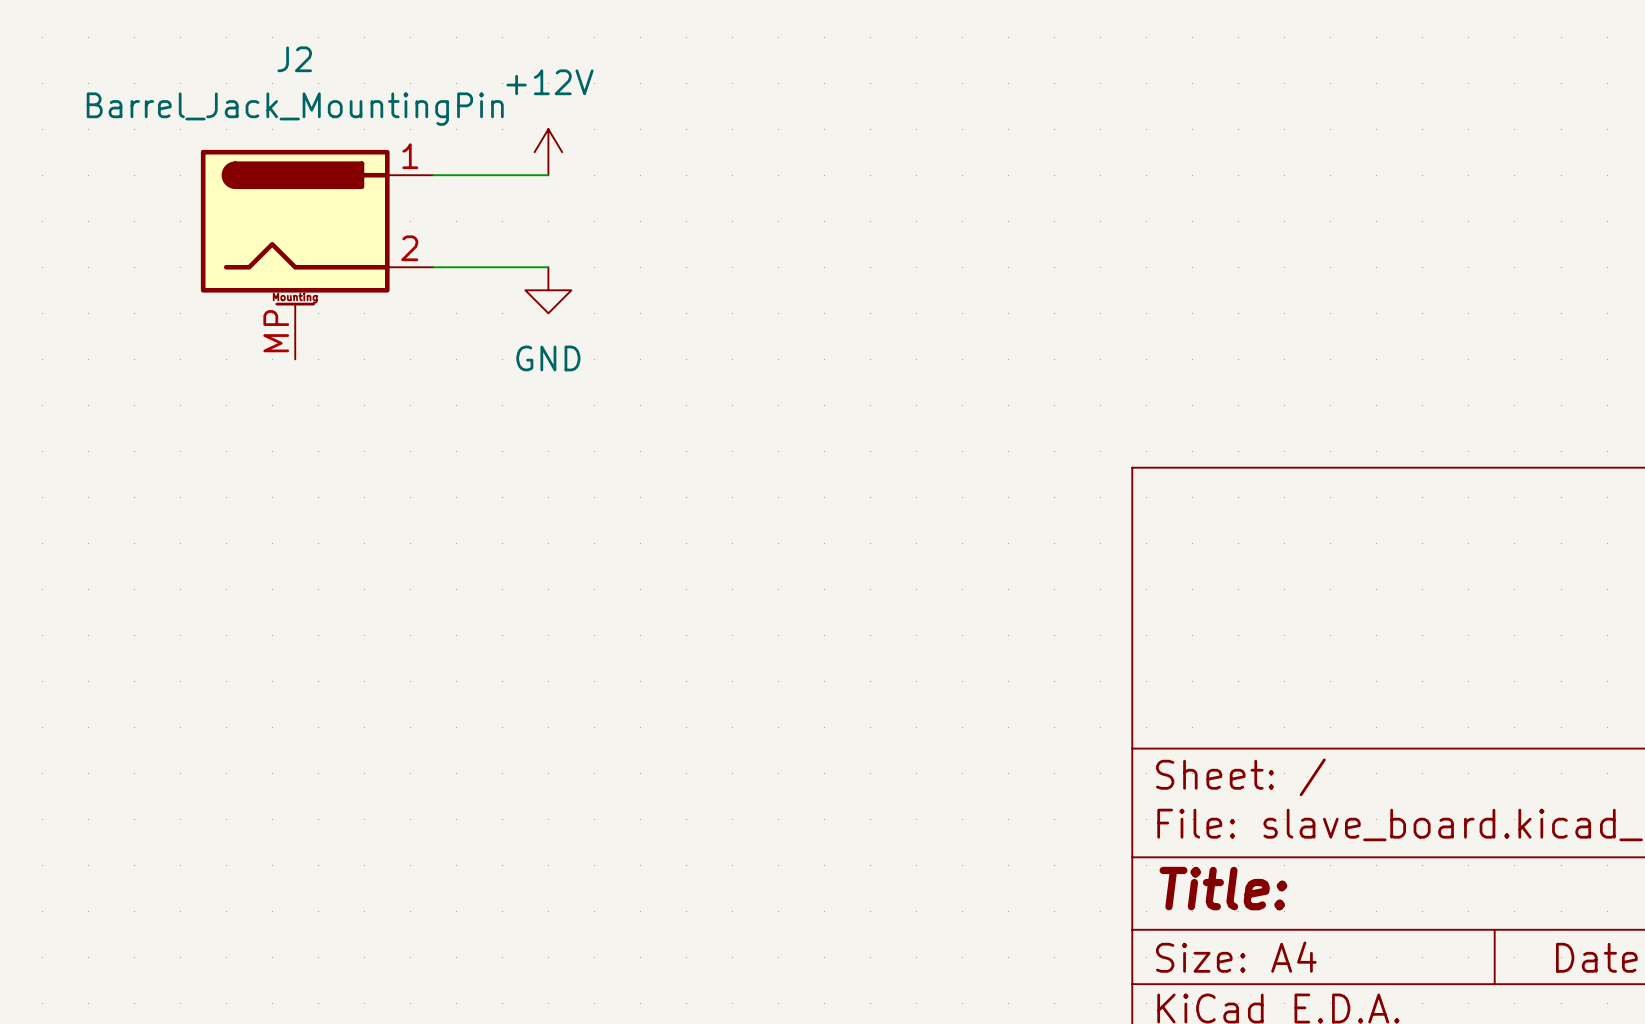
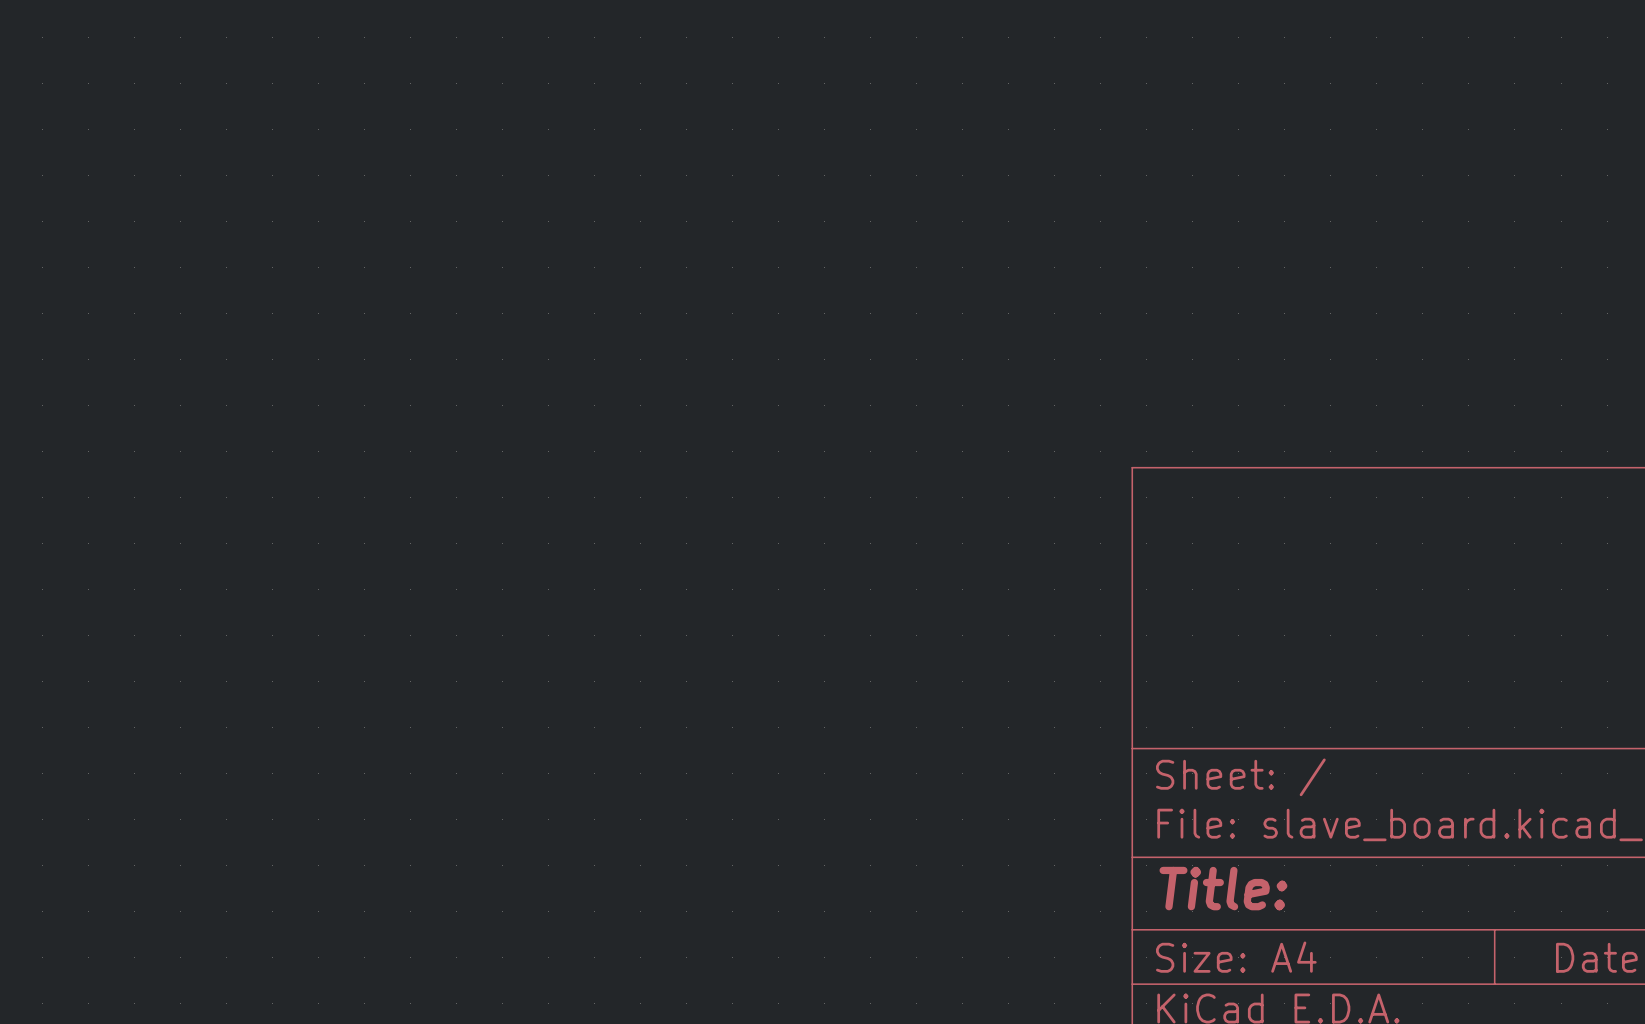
power symbol: +12V (548, 152) -> none
wire: (433, 175) (548, 175) -> none
J2: Barrel_Jack_MountingPin (317, 254) -> none
wire: (433, 267) (548, 267) -> none
power symbol: GND (548, 290) -> none

